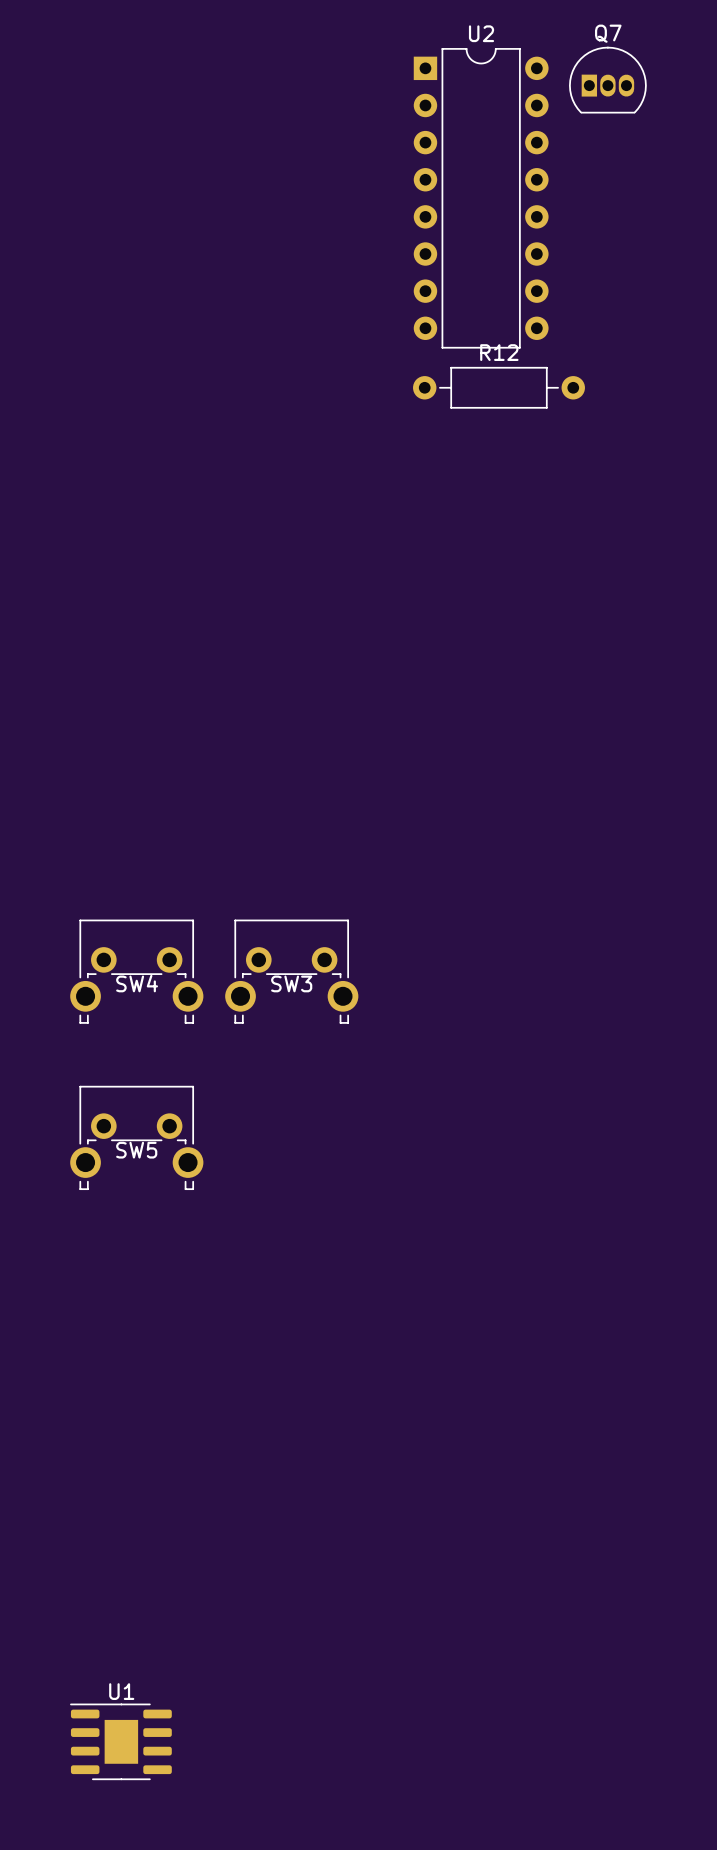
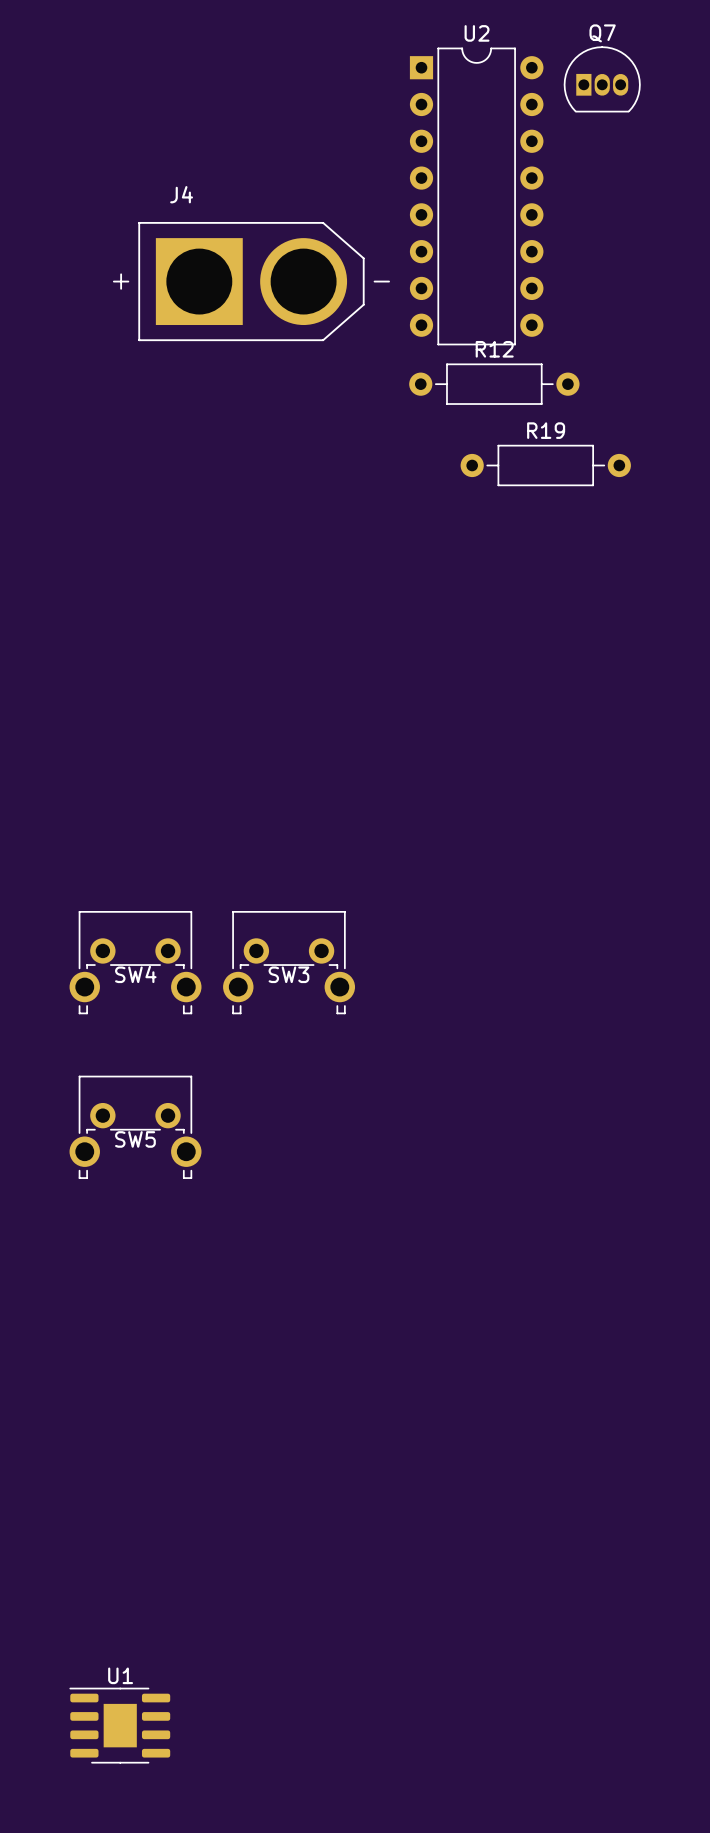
J4: none -> (251, 281)
R19: none -> (545, 465)

